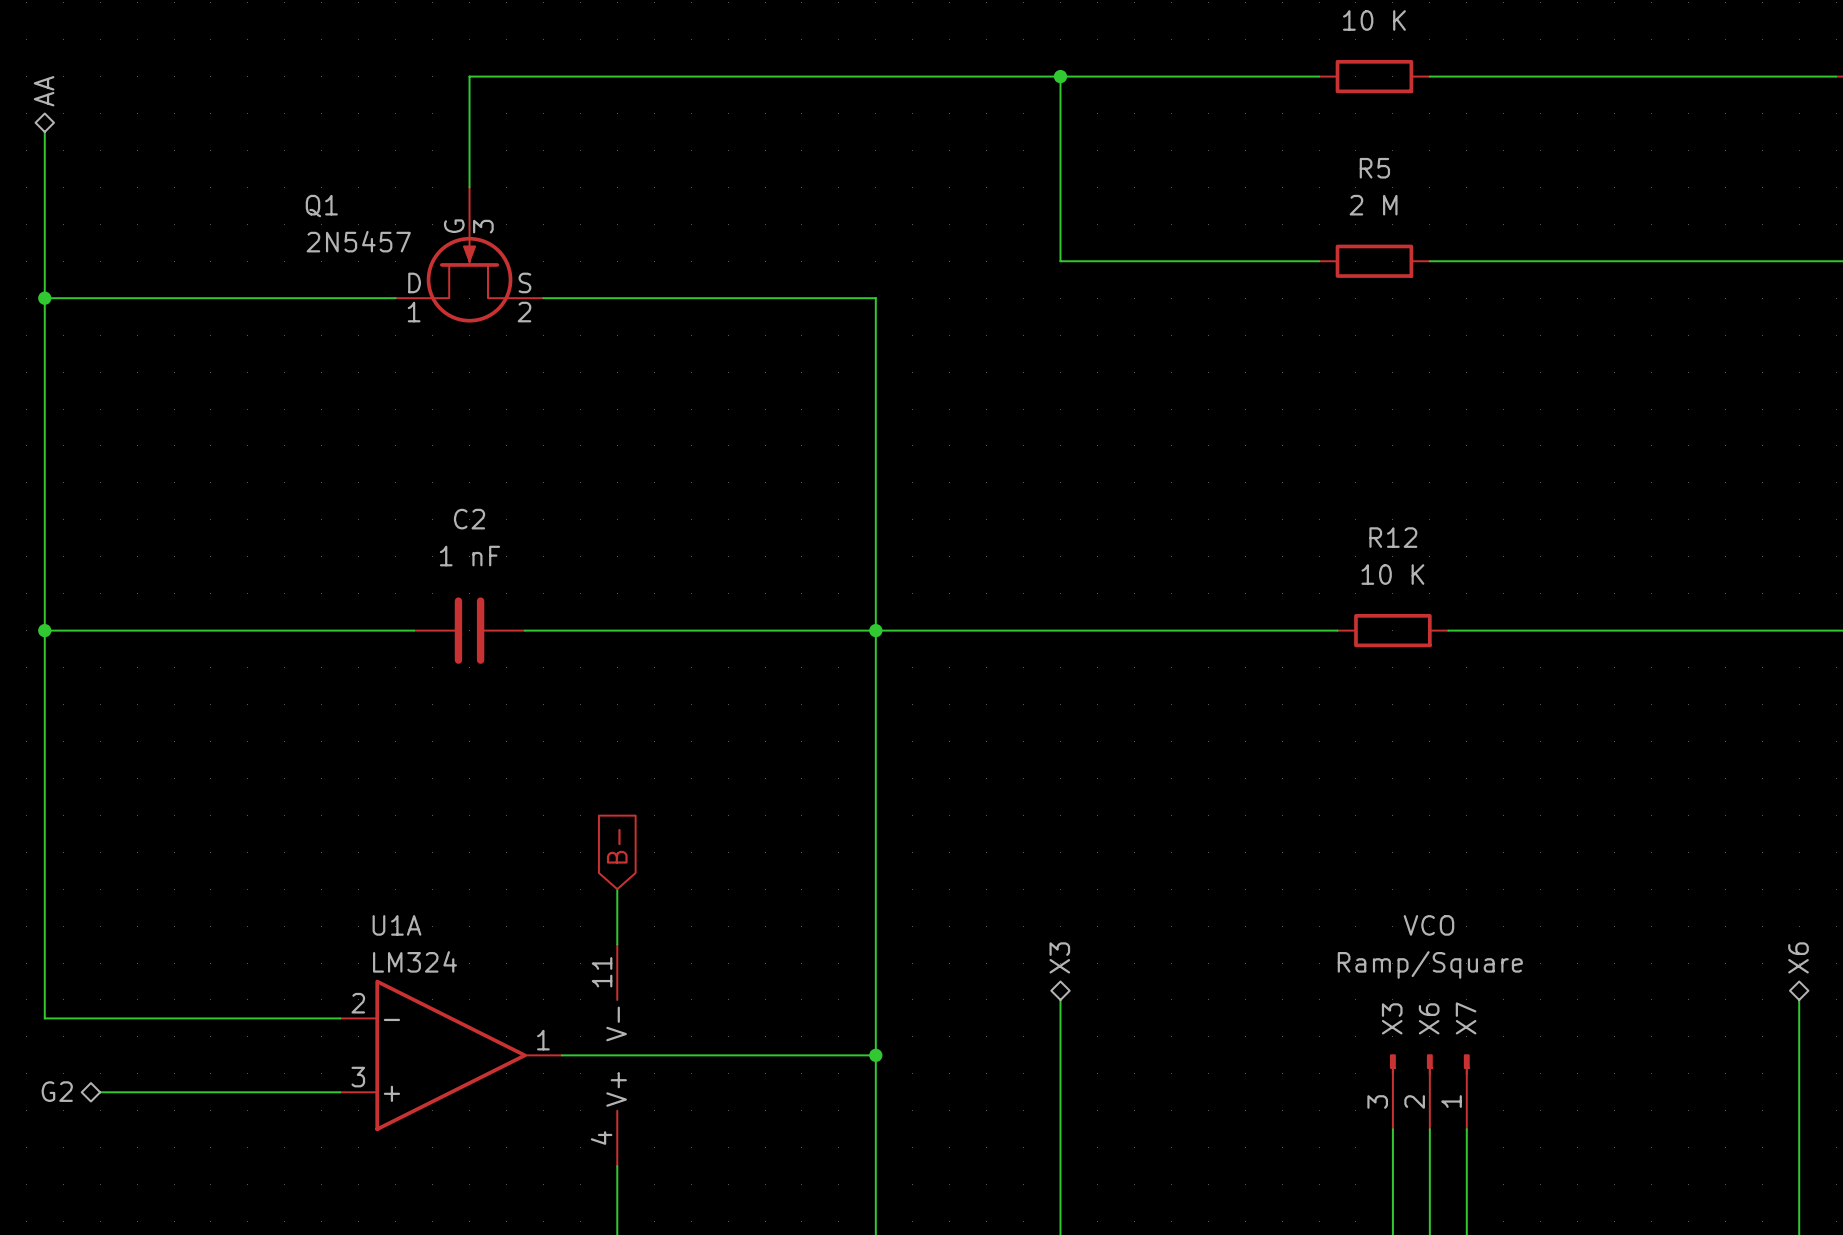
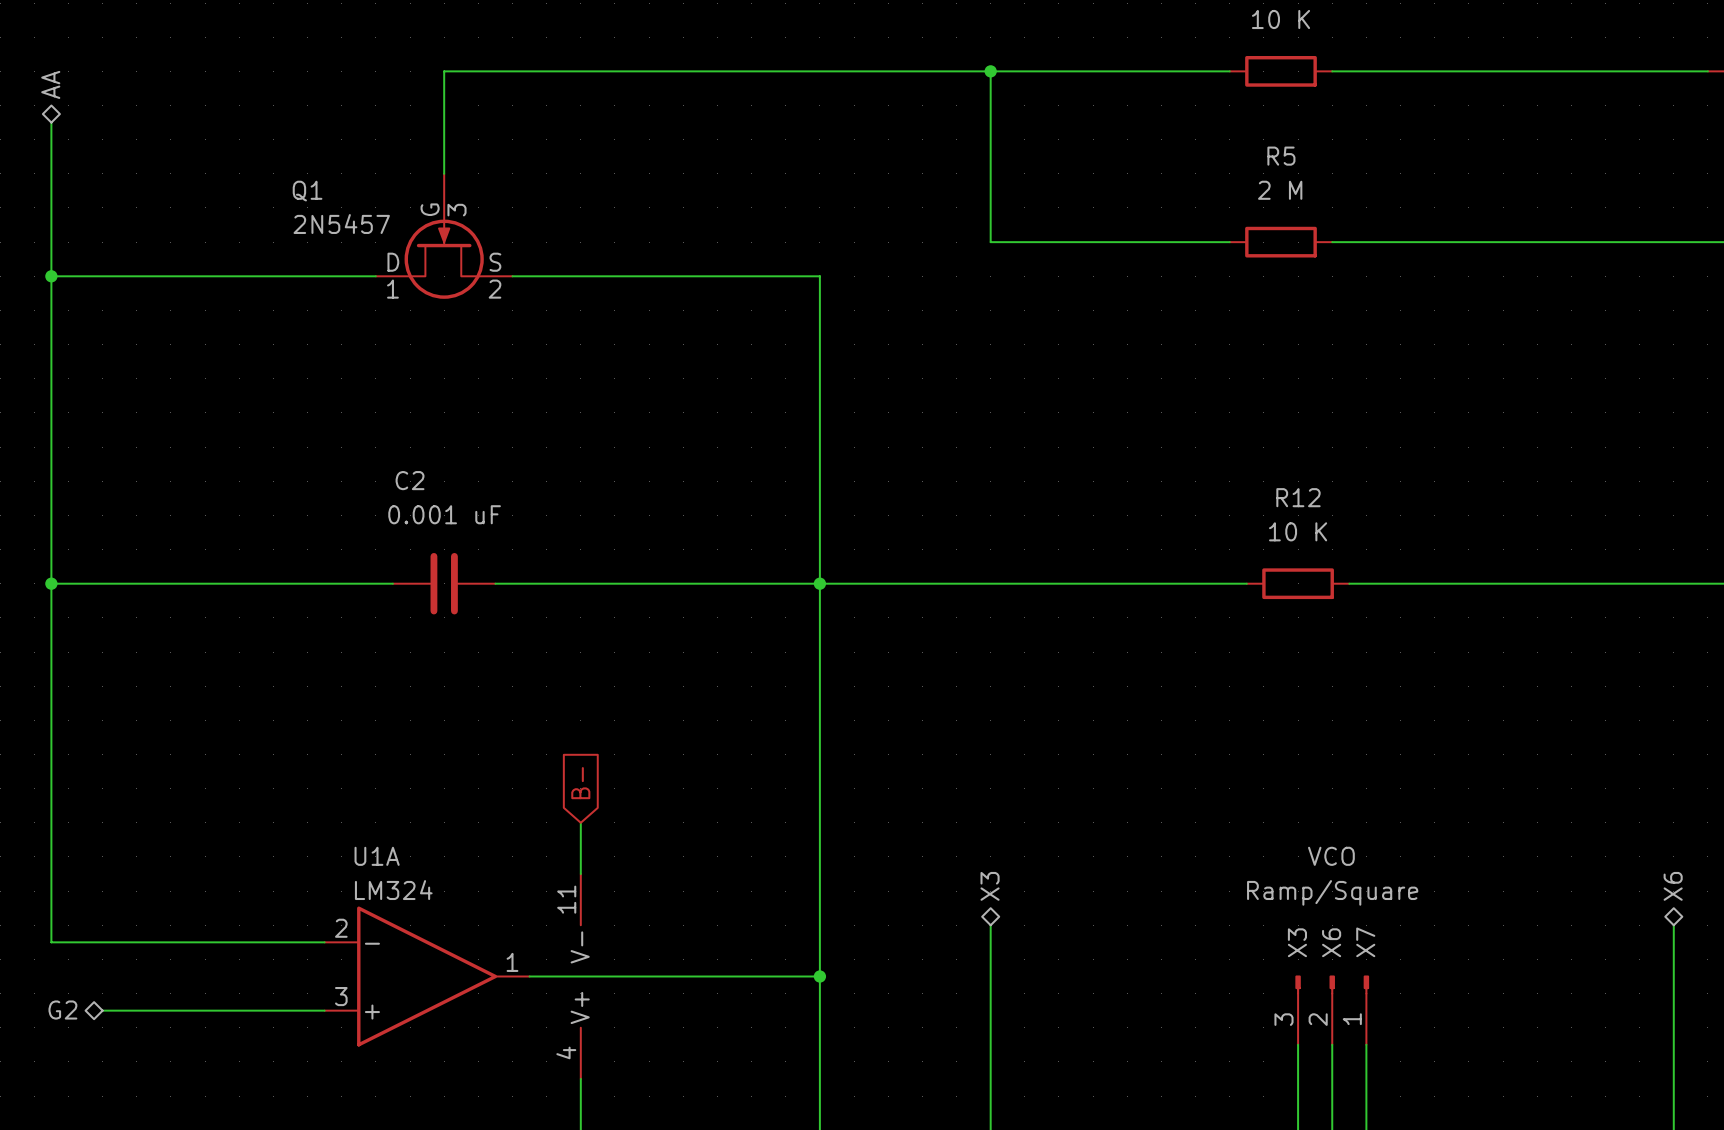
C2 name position: C2 (469, 519) -> C2 (410, 480)
C2 value: 1 nF (469, 556) -> 0.001 uF (444, 514)

